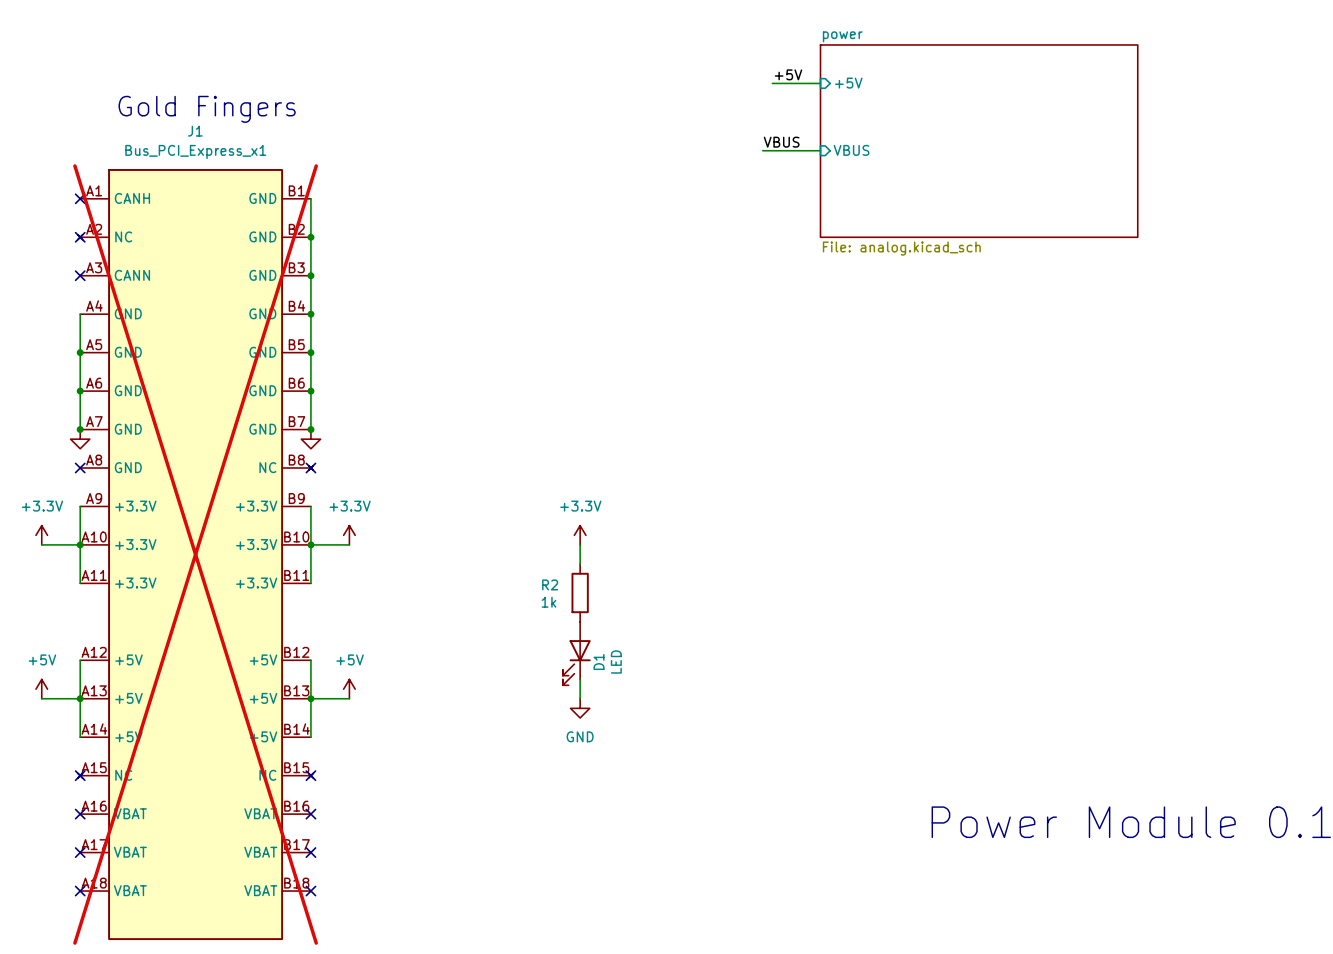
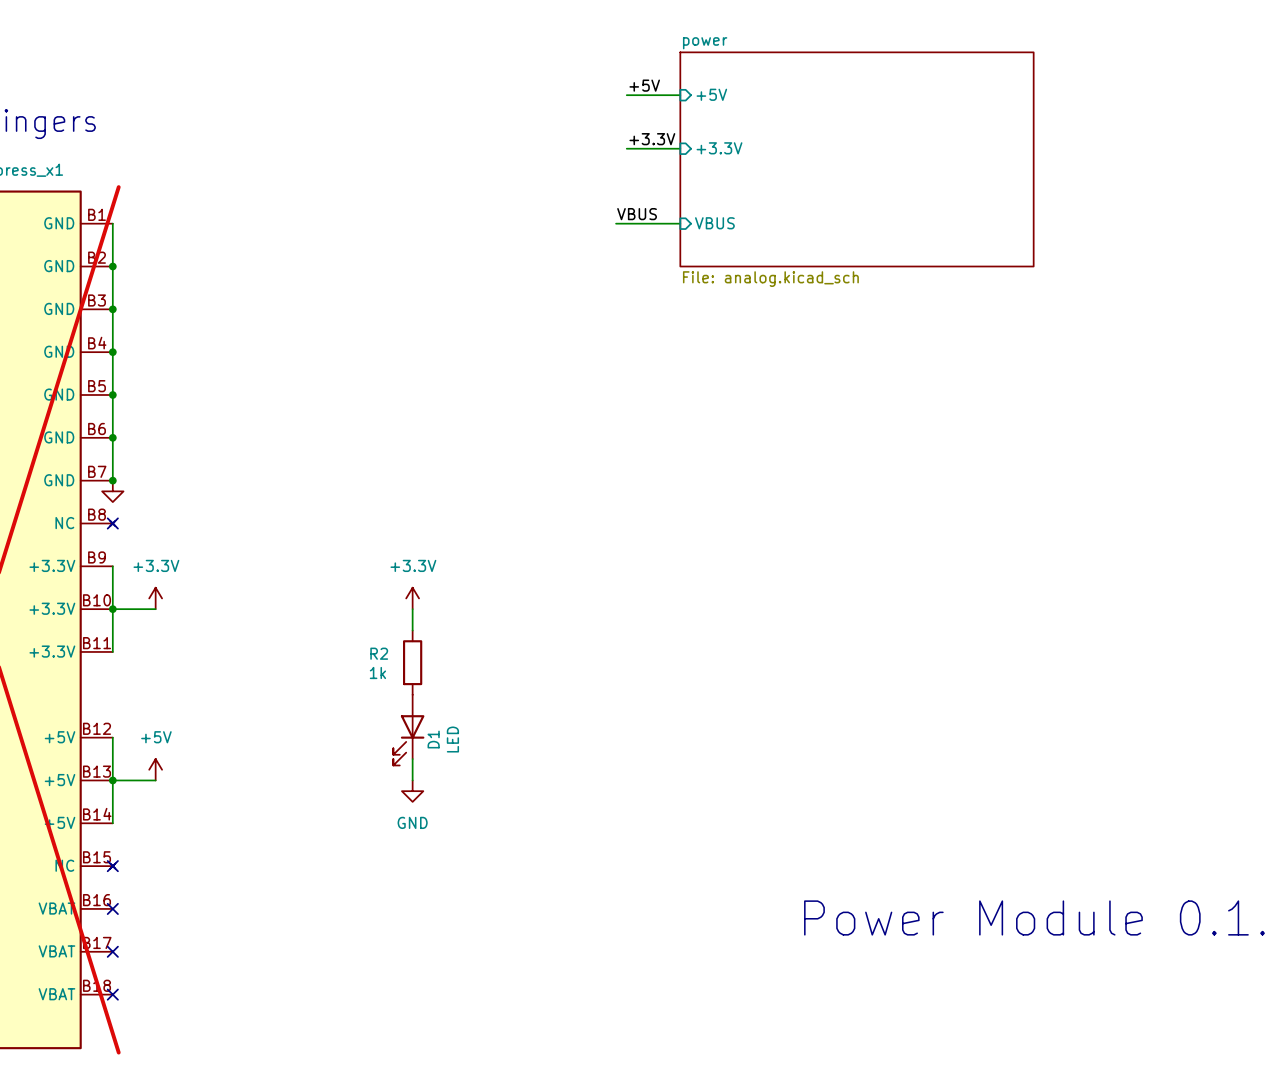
label: none -> +3.3V (652, 139)
wire: none -> (626, 148) (680, 148)
sheet pin: none -> +3.3V (719, 148)
label position: VBUS (781, 142) -> VBUS (637, 214)
wire: (762, 150) (820, 150) -> (616, 223) (680, 223)
sheet pin position: VBUS (851, 150) -> VBUS (714, 223)

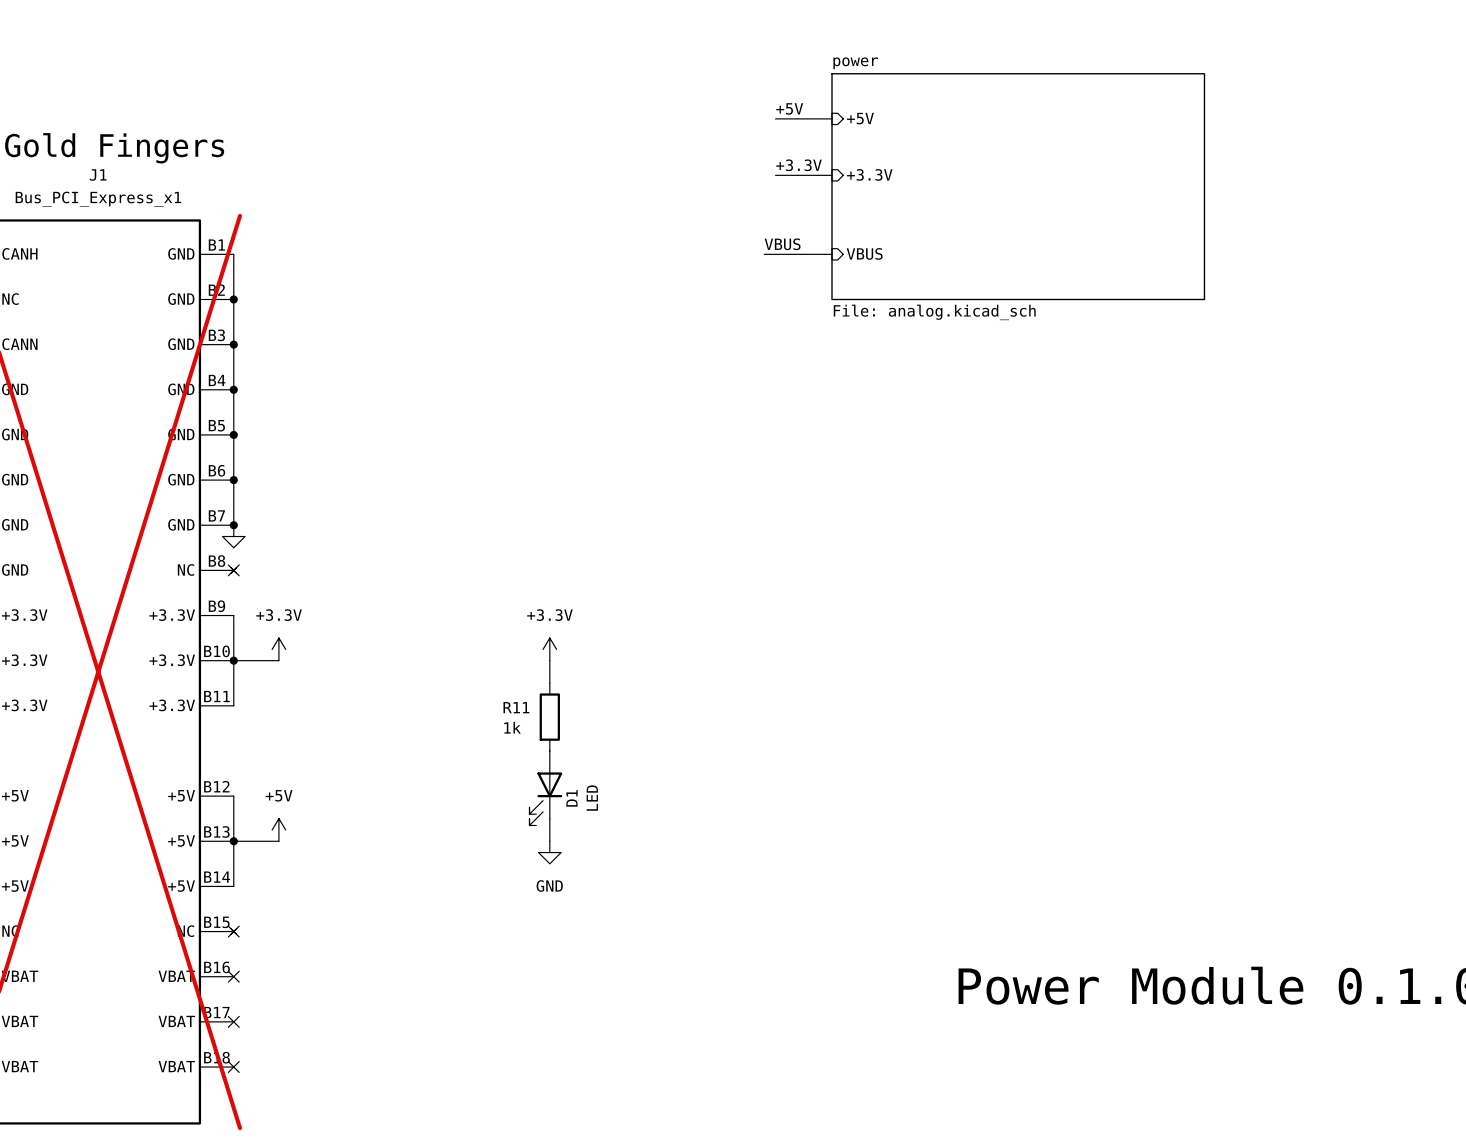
R2 name: R2 (379, 653) -> R11 (516, 707)

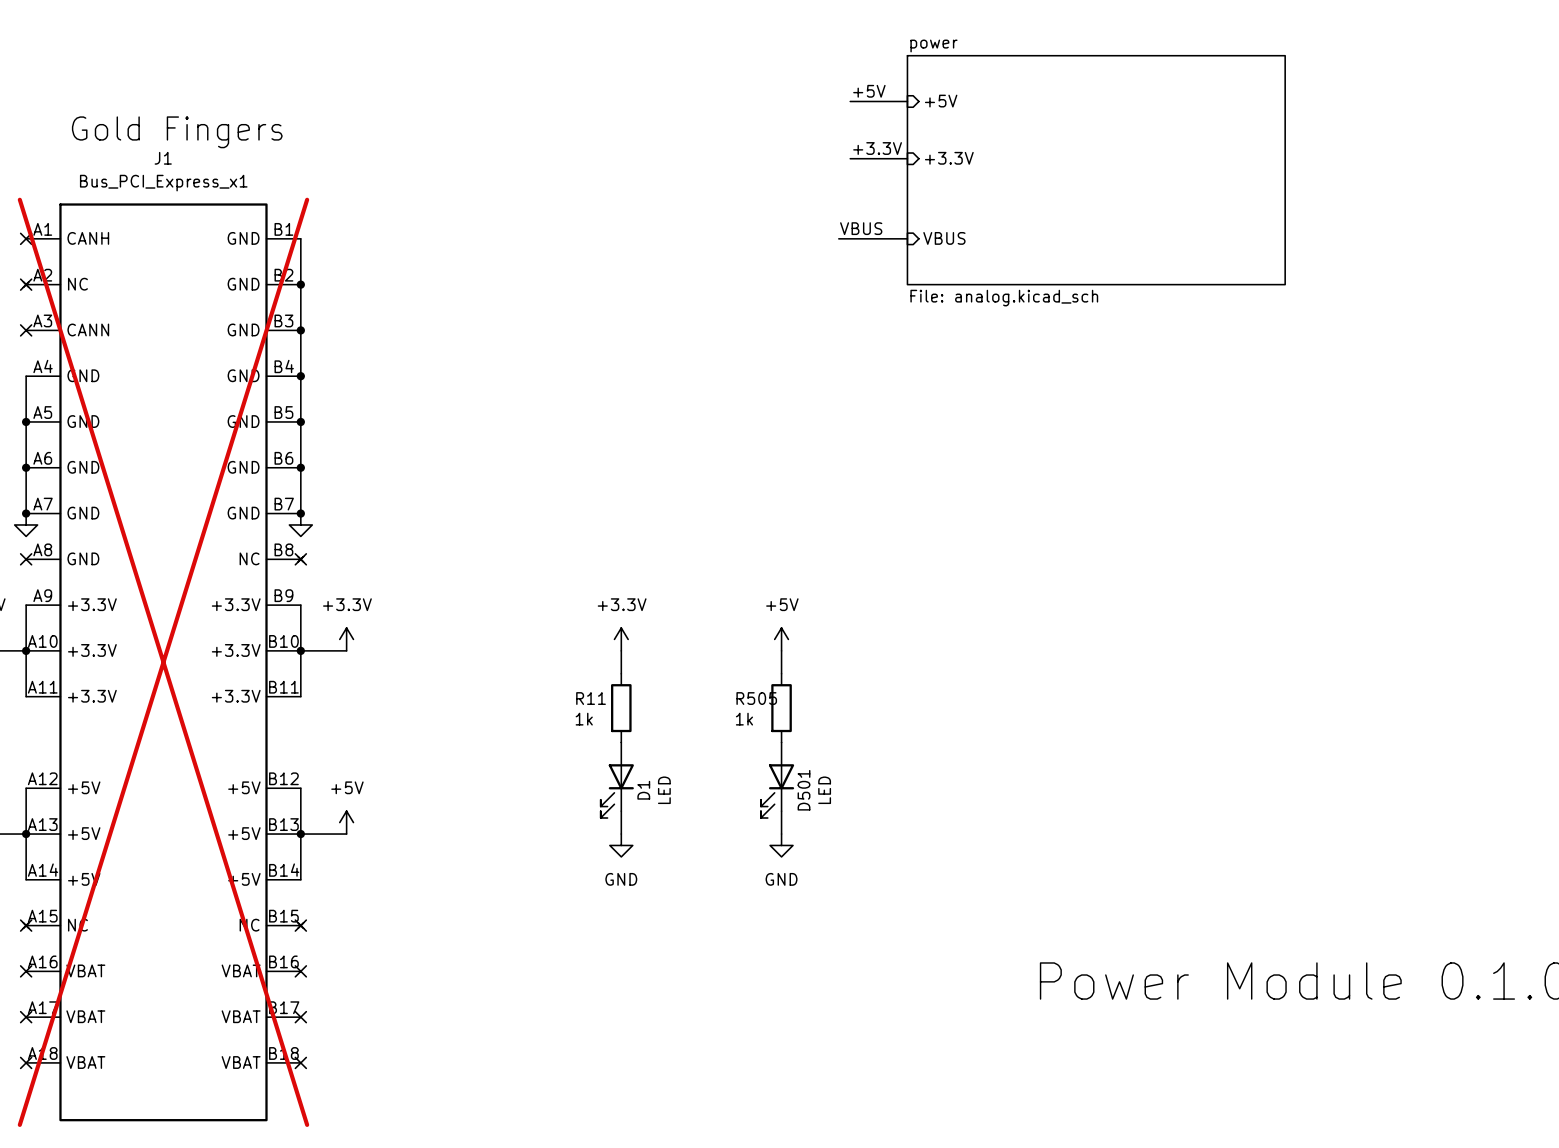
power symbol: none -> +5V (781, 639)
wire: none -> (781, 650) (781, 673)
R505: none -> 1k (781, 708)
D501: none -> LED (777, 780)
wire: none -> (781, 811) (781, 834)
power symbol: none -> GND (781, 845)

